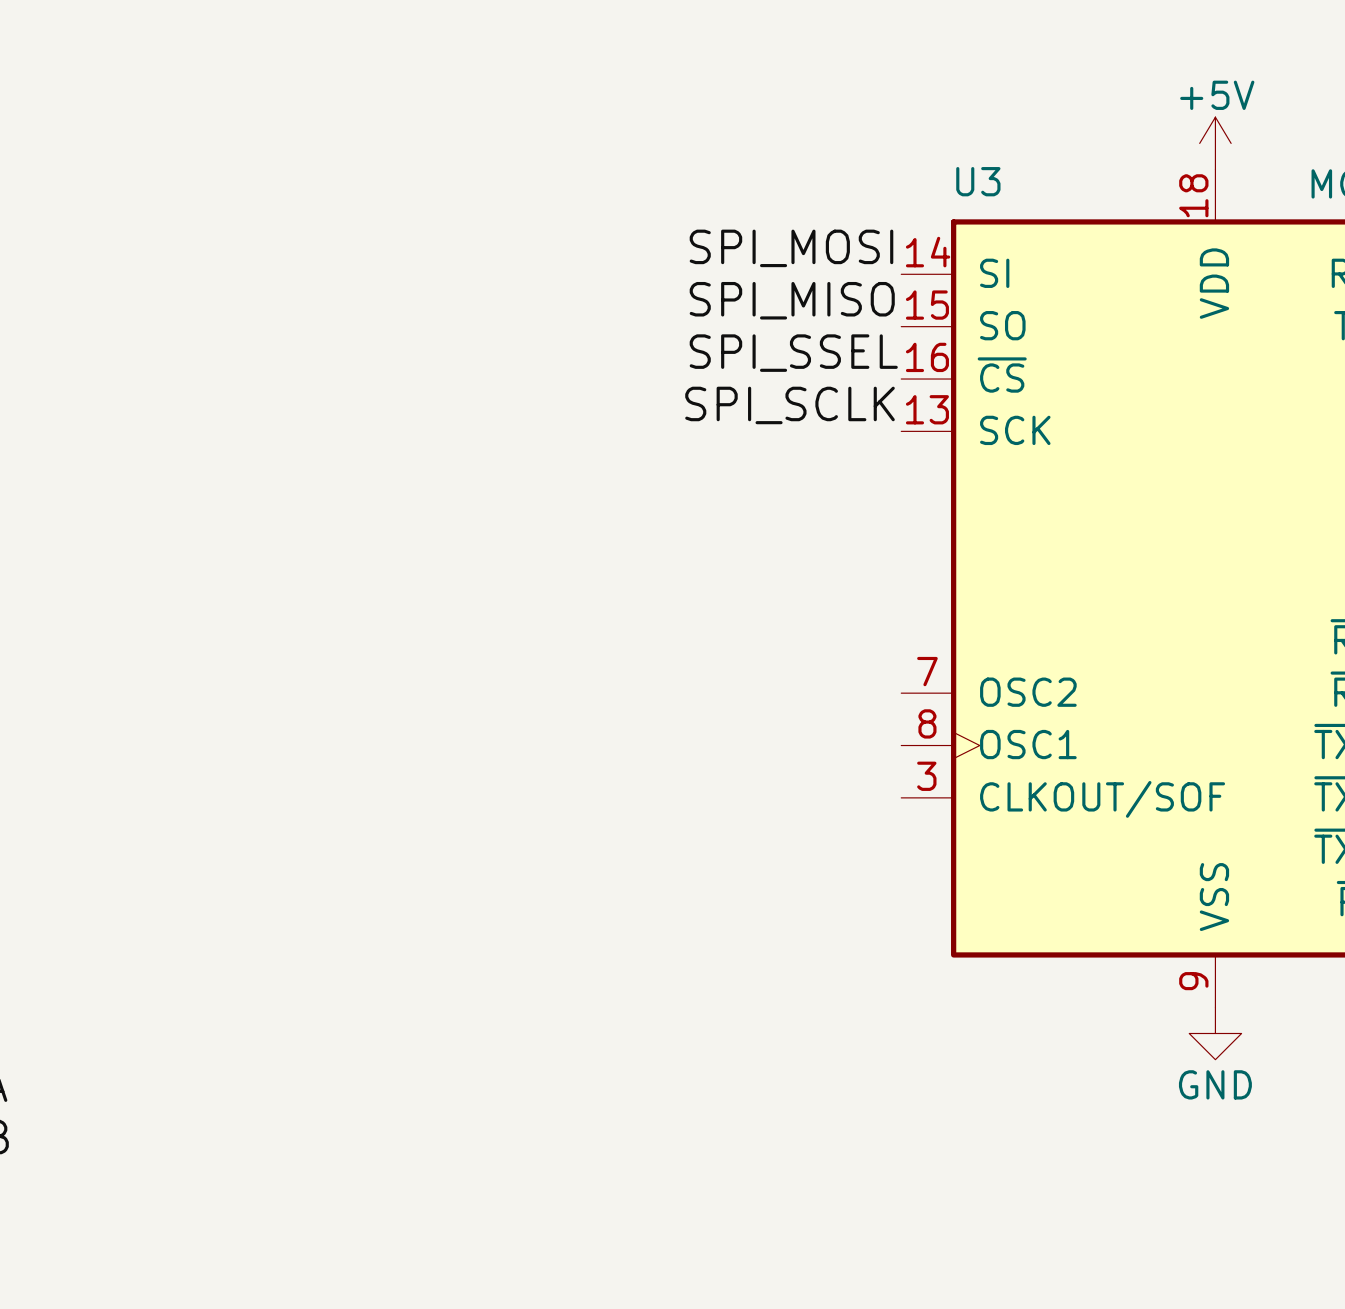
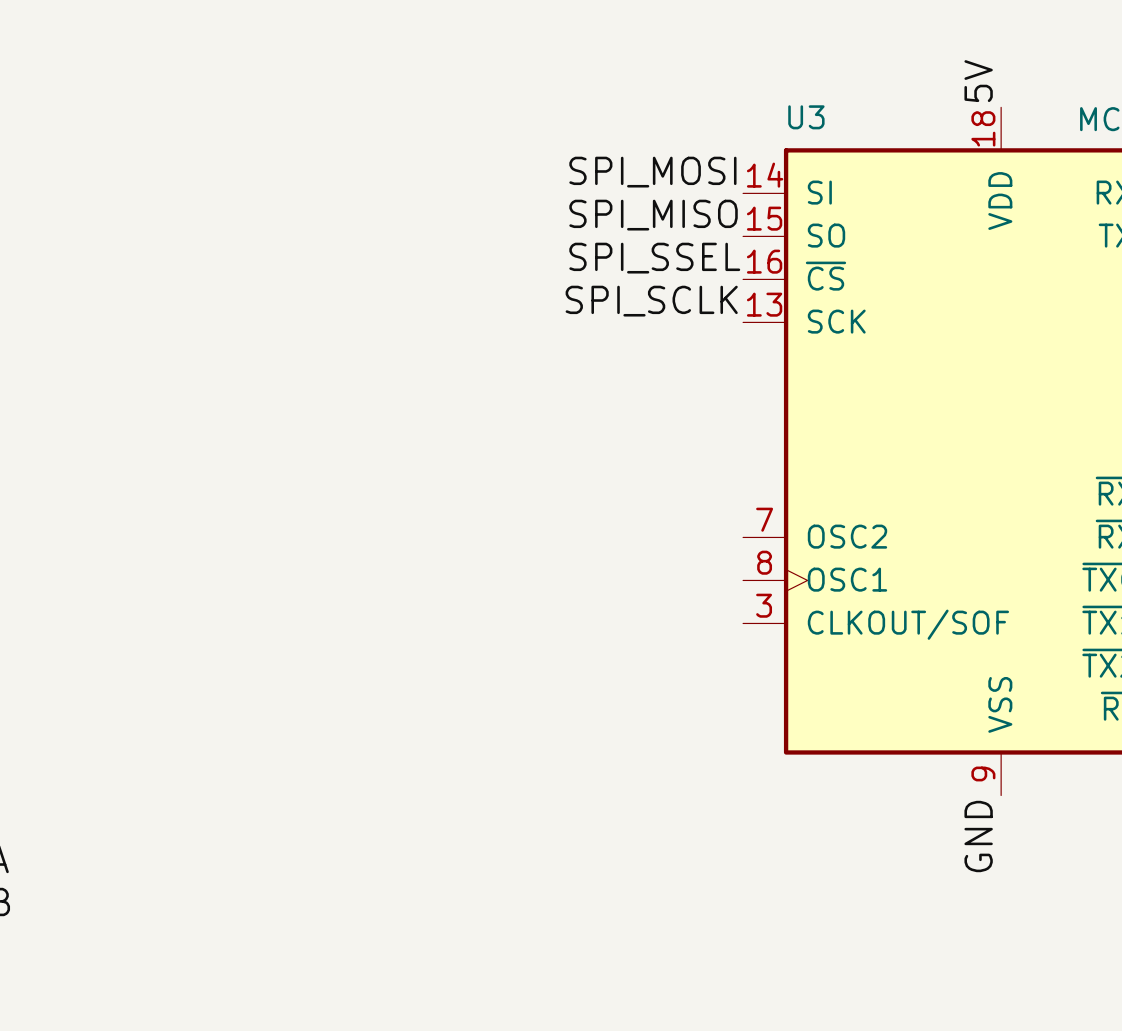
label: none -> 5V (978, 81)
power symbol: +5V (1215, 143) -> none
power symbol: GND (1215, 1033) -> none
label: none -> GND (978, 836)

